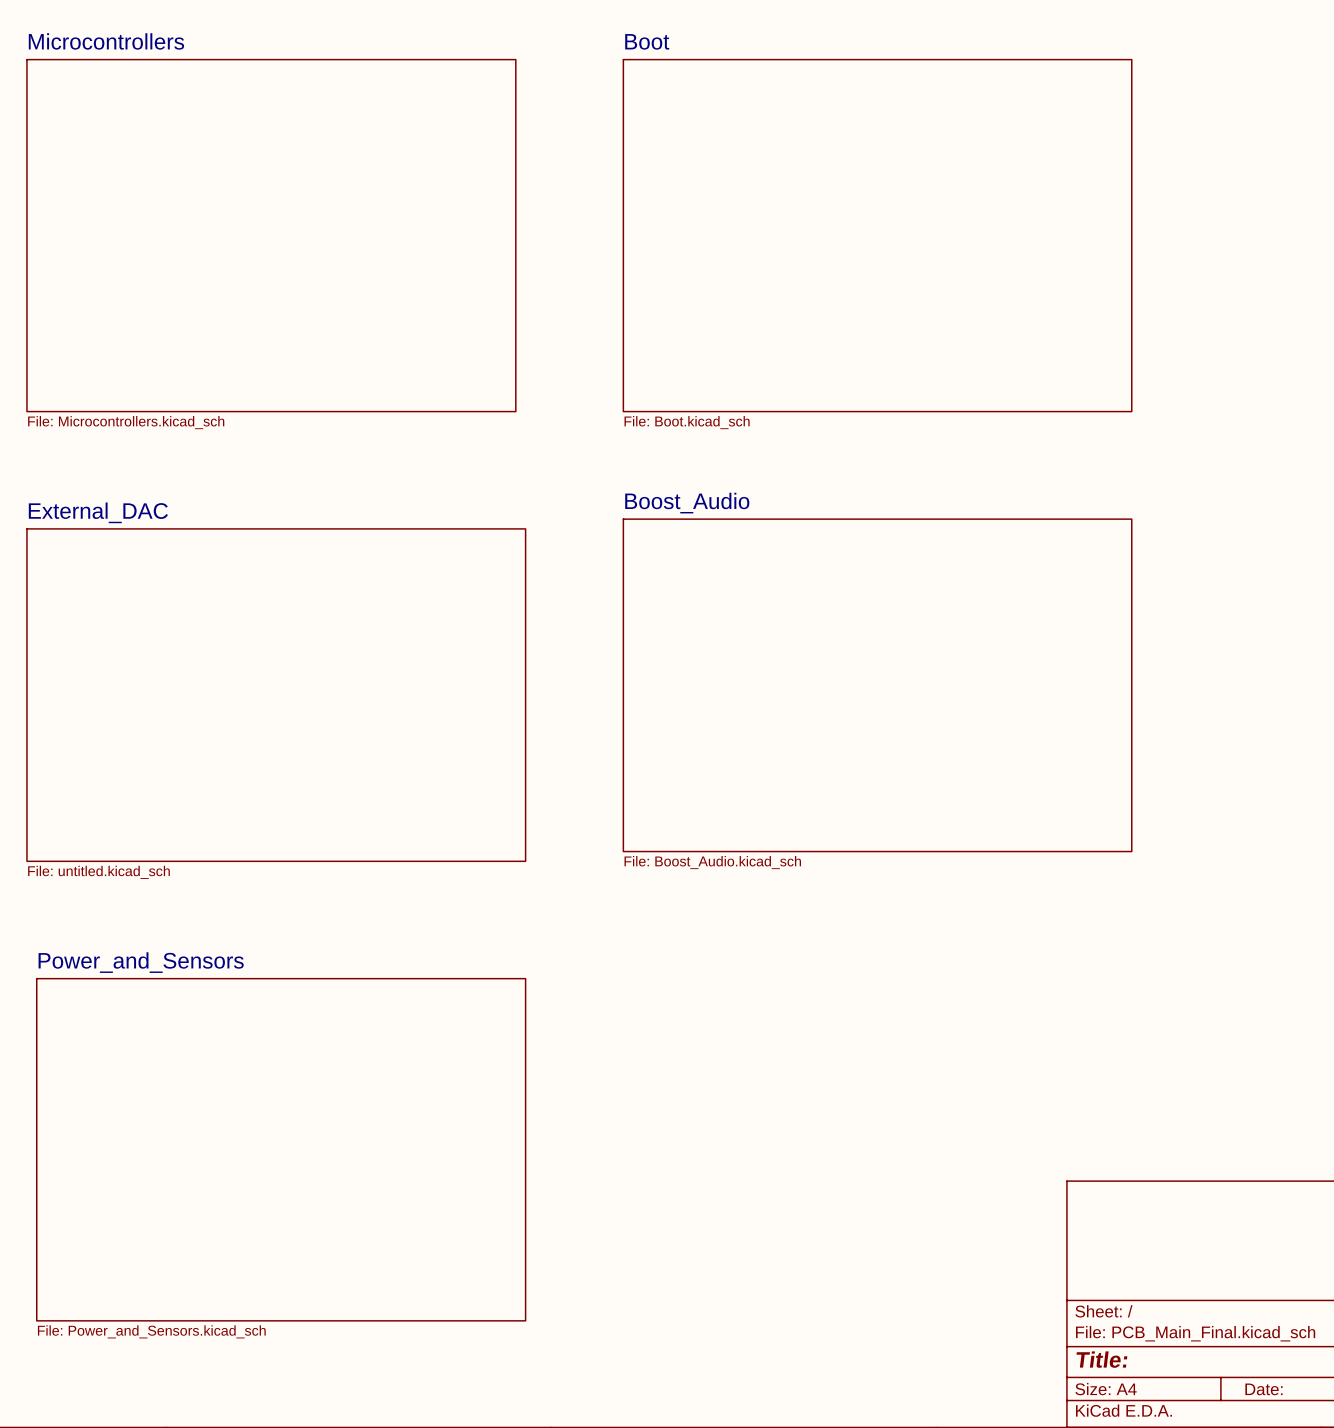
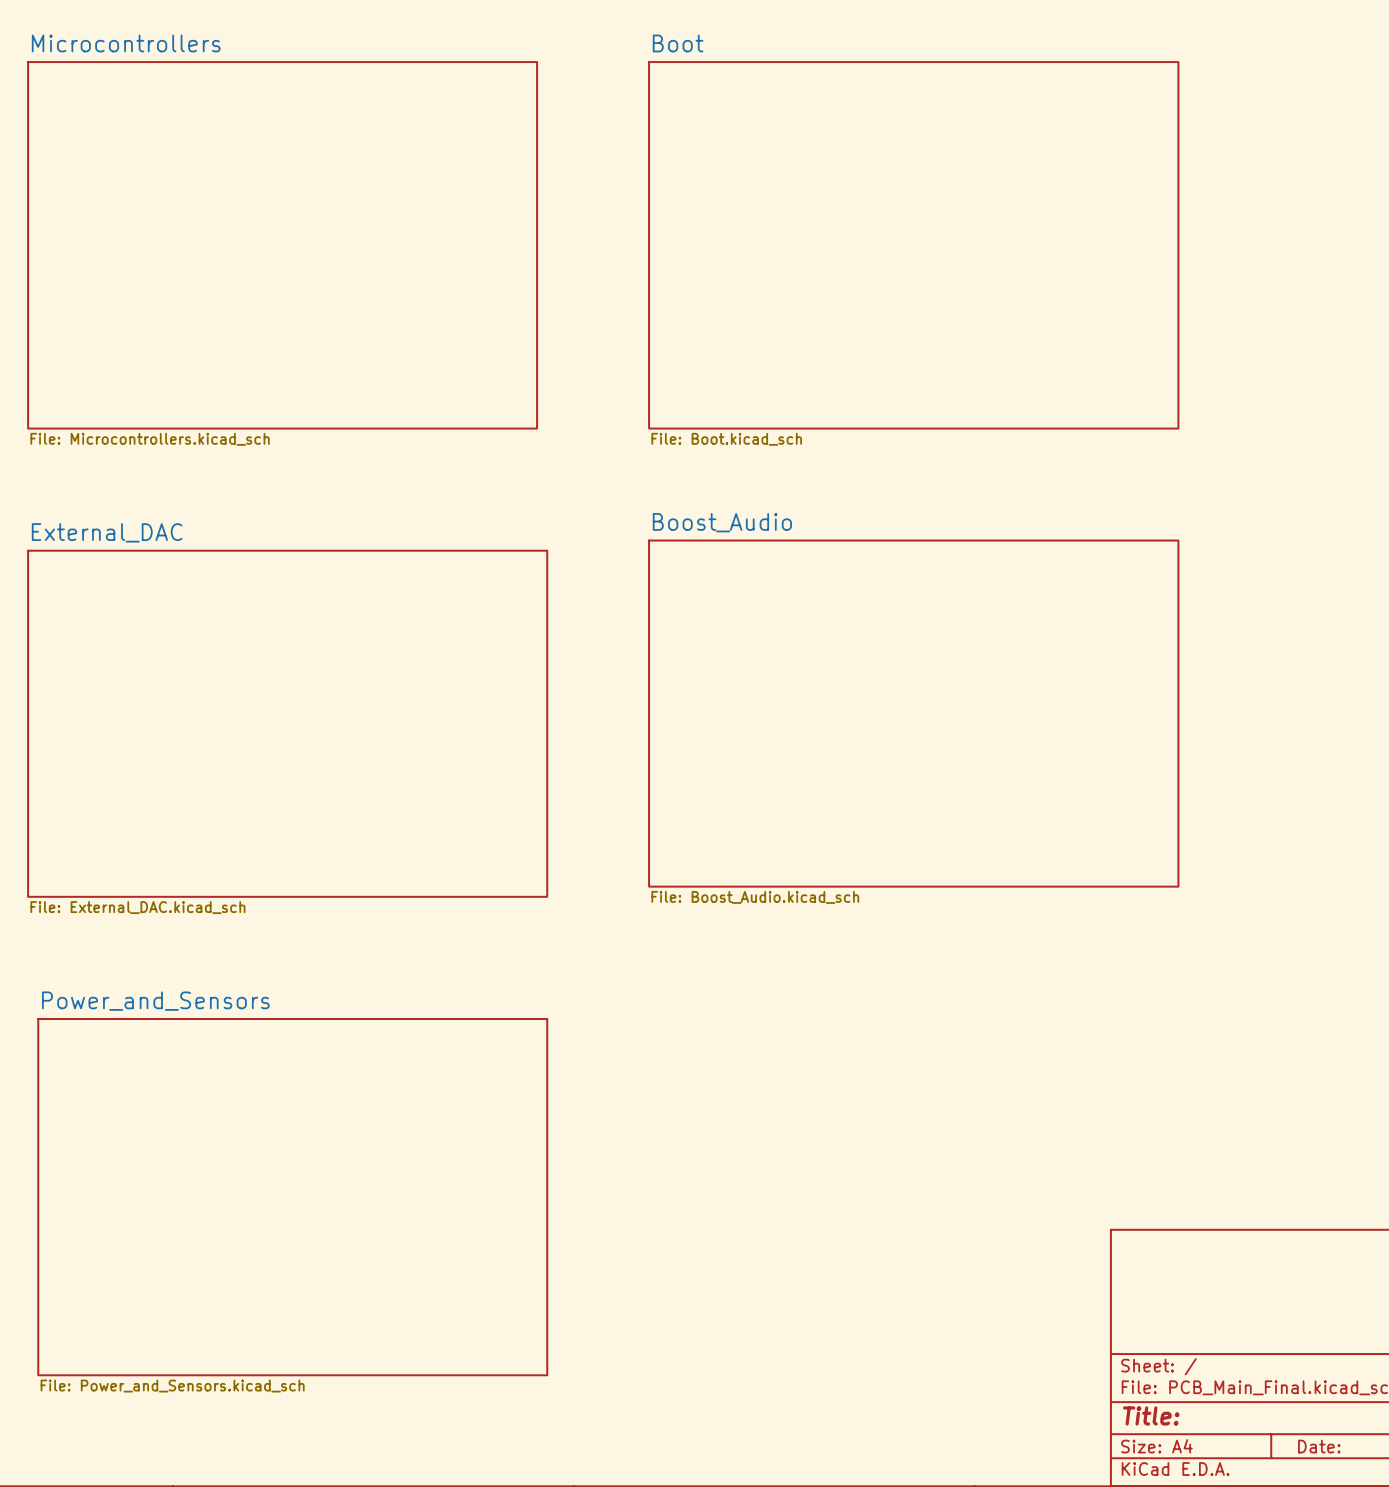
sheet External_DAC value: File: untitled.kicad_sch (98, 872) -> File: External_DAC.kicad_sch (137, 907)

